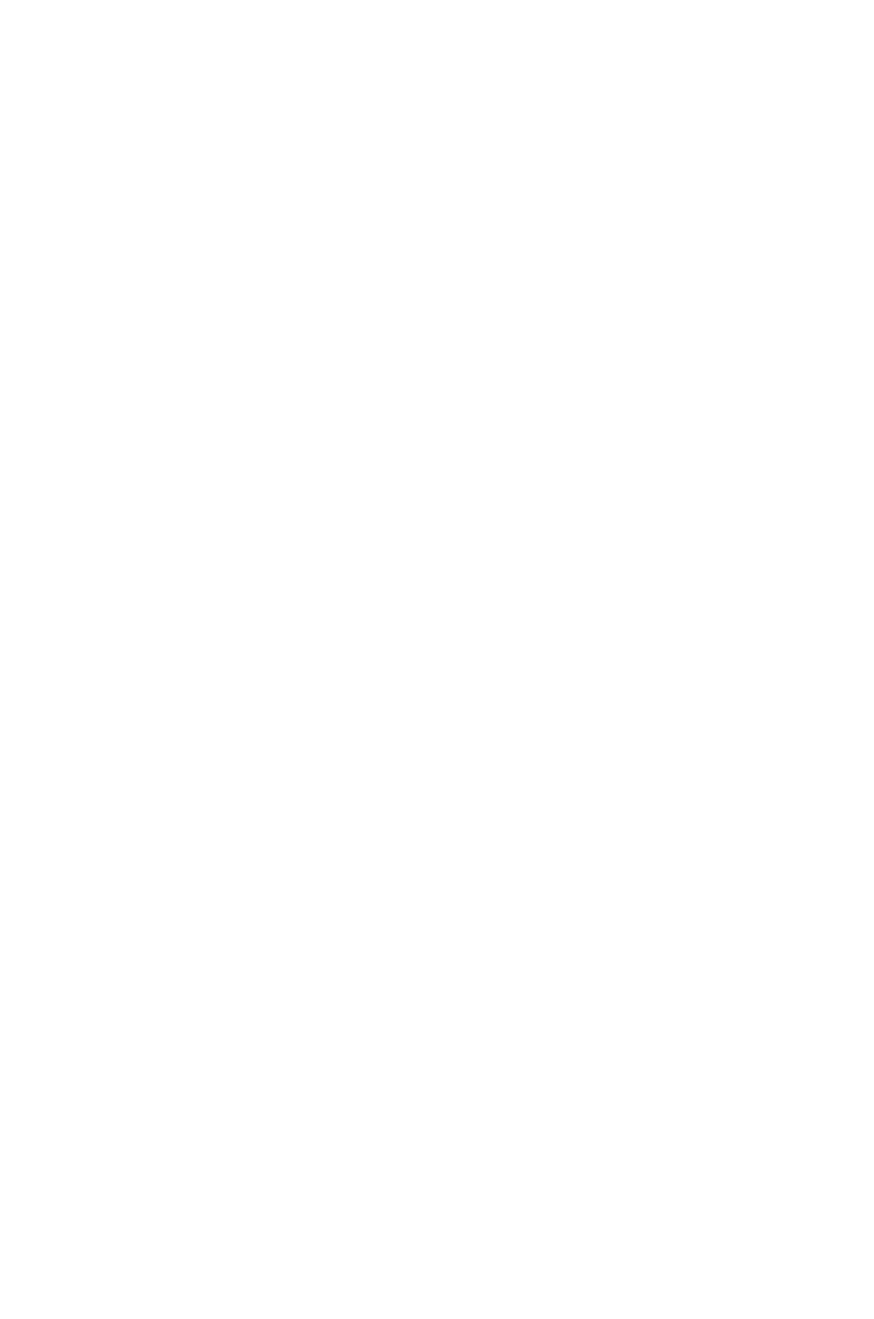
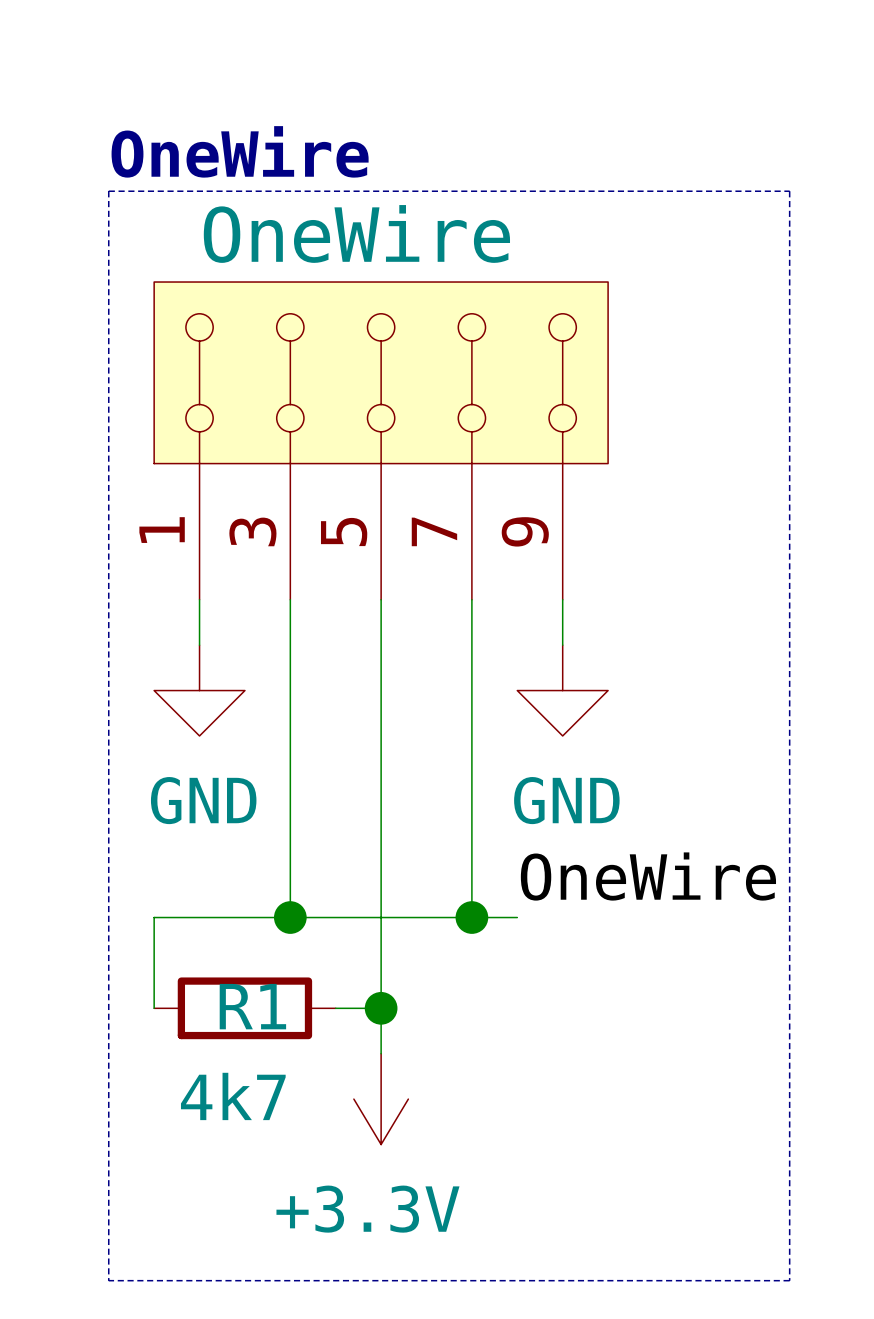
text: none -> OneWire (240, 151)
line: none -> (108, 191) (789, 191) (789, 1280) (108, 1280) (108, 191)
part: none -> OneWire (381, 440)
wire: none -> (199, 599) (199, 645)
wire: none -> (290, 599) (290, 917)
wire: none -> (381, 599) (381, 1053)
wire: none -> (471, 599) (471, 917)
wire: none -> (562, 599) (562, 645)
power symbol: none -> GND (199, 690)
power symbol: none -> GND (562, 690)
label: none -> OneWire (648, 876)
junction: none -> (290, 917)
junction: none -> (471, 917)
wire: none -> (517, 917) (154, 917) (154, 1008)
R1: none -> 4k7 (244, 1008)
wire: none -> (335, 1008) (381, 1008)
junction: none -> (381, 1008)
power symbol: none -> +3.3V (381, 1099)

